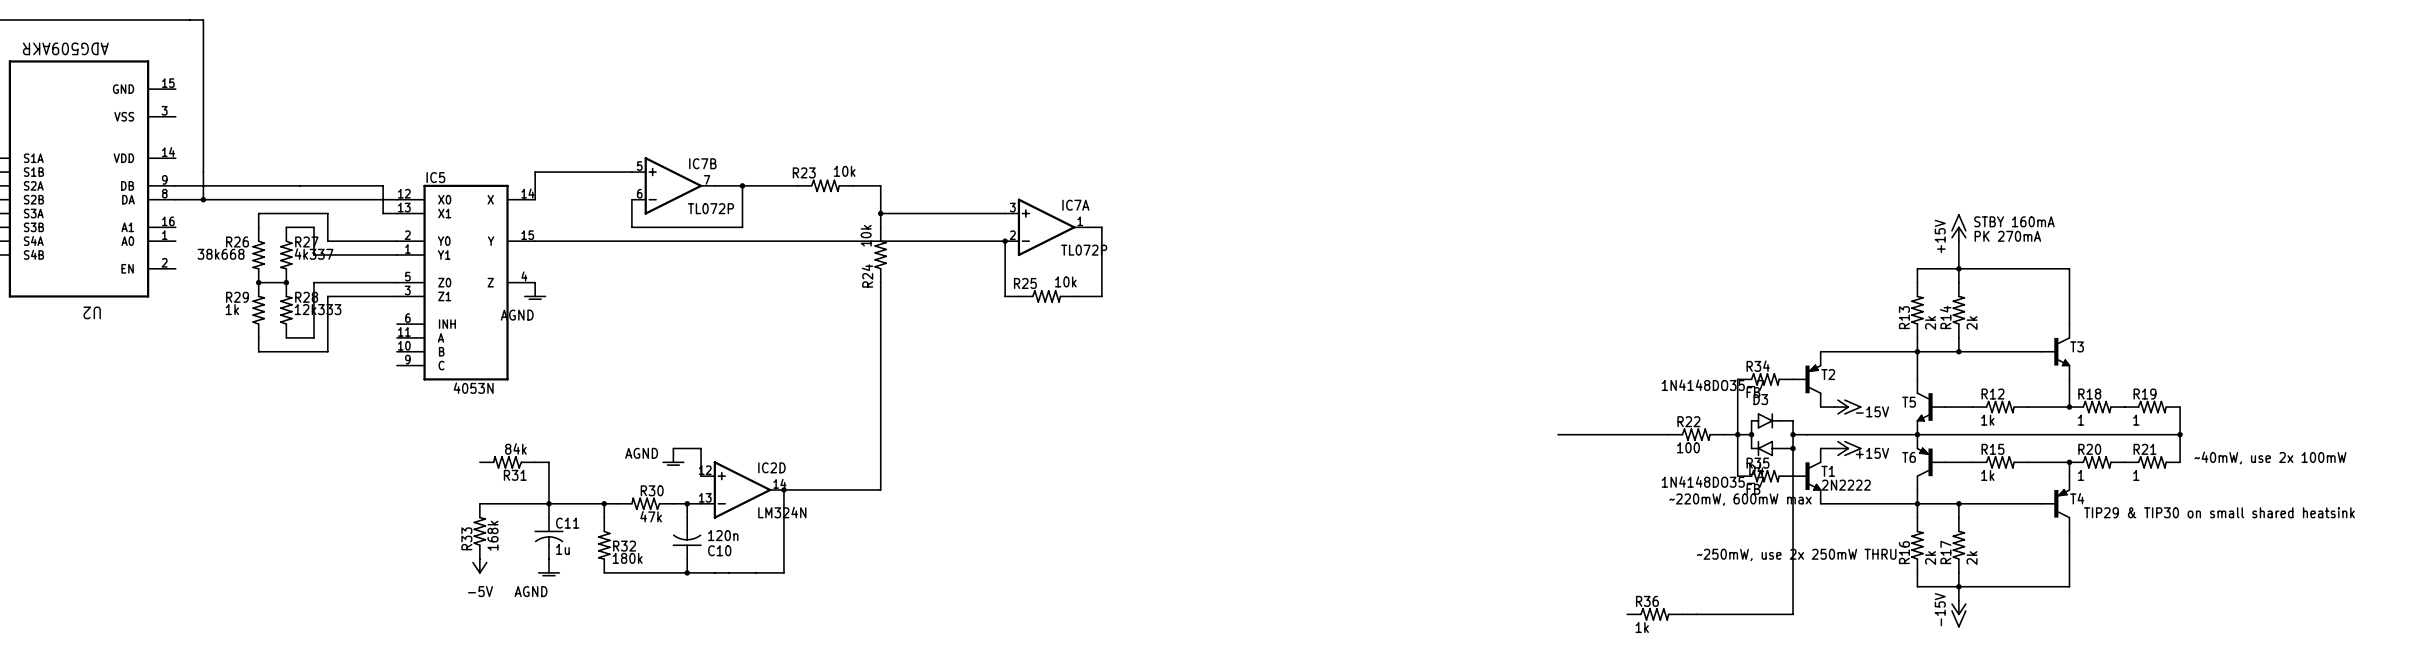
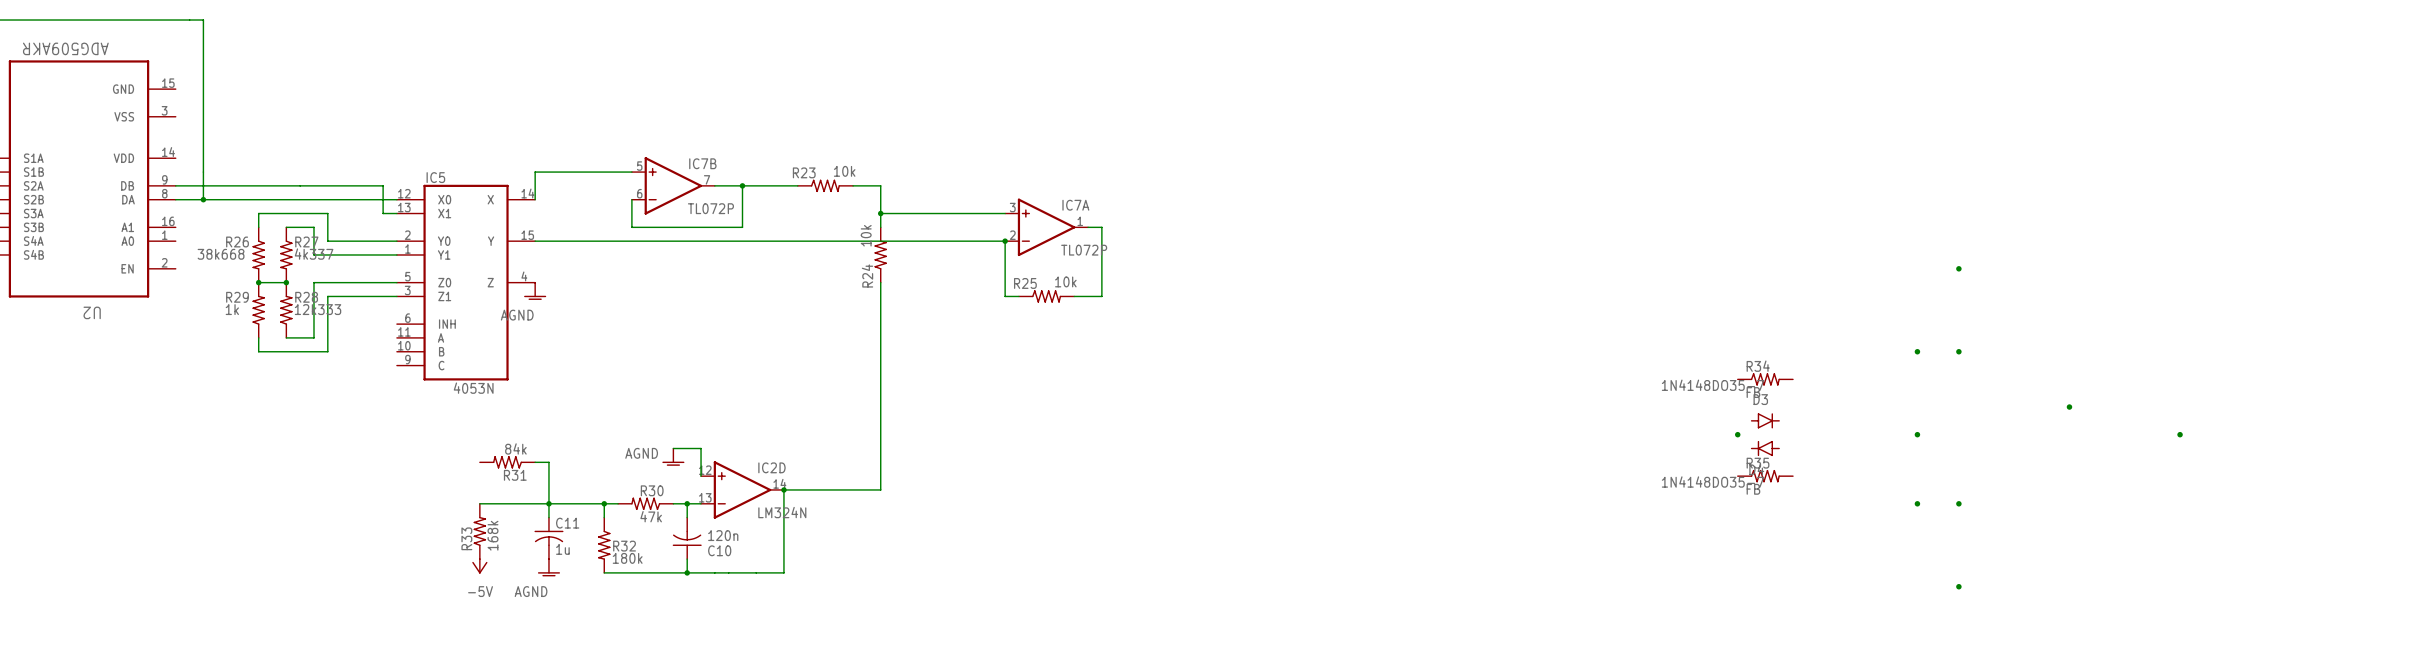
text: STBY 160mA (2014, 221) -> none
power symbol: +15V (1958, 227) -> none
text: PK 270mA (2007, 236) -> none
wire: (1958, 241) (1958, 282) -> none
wire: (1917, 282) (1917, 268) (2069, 268) (2069, 324) -> none
R13: 2k (1917, 310) -> none
R14: 2k (1958, 310) -> none
wire: (1917, 337) (1917, 379) -> none
wire: (1958, 337) (1958, 351) -> none
wire: (1820, 351) (2041, 351) -> none
T3: (2055, 351) -> none
wire: (1737, 379) (1737, 476) -> none
T2: (1807, 379) -> none
wire: (2069, 379) (2069, 407) (2028, 407) -> none
wire: (1820, 407) (1834, 407) -> none
power symbol: -15V (1847, 407) -> none
T5: (1931, 407) -> none
wire: (1945, 407) (1972, 407) -> none
R12: 1k (2000, 407) -> none
R18: 1 (2097, 407) -> none
R19: 1 (2152, 407) -> none
wire: (2180, 407) (2180, 462) -> none
wire: (1751, 420) (1751, 448) -> none
wire: (1779, 420) (1793, 420) (1793, 614) (1682, 614) -> none
wire: (1558, 434) (1668, 434) -> none
R22: 100 (1696, 434) -> none
wire: (1723, 434) (1751, 434) -> none
junction: (1751, 434) -> none
wire: (1793, 434) (2180, 434) -> none
junction: (1793, 434) -> none
wire: (1779, 448) (1793, 448) -> none
junction: (1793, 448) -> none
wire: (1820, 448) (1834, 448) -> none
power symbol: +15V (1847, 448) -> none
text: ~40mW, use 2x 100mW (2270, 457) -> none
T6: (1931, 462) -> none
wire: (1945, 462) (1972, 462) -> none
R15: 1k (2000, 462) -> none
wire: (2028, 462) (2069, 462) (2069, 476) -> none
junction: (2069, 462) -> none
R20: 1 (2097, 462) -> none
R21: 1 (2152, 462) -> none
T1: 2N2222 (1807, 476) -> none
wire: (1917, 489) (1917, 517) -> none
text: ~220mW, 600mW max (1740, 499) -> none
wire: (1820, 503) (2041, 503) -> none
wire: (1958, 503) (1958, 517) -> none
T4: (2055, 503) -> none
text: TIP29 & TIP30 on small shared heatsink (2219, 512) -> none
wire: (2069, 531) (2069, 586) (1917, 586) (1917, 572) -> none
R16: 2k (1917, 545) -> none
R17: 2k (1958, 545) -> none
text: ~250mW, use 2x 250mW THRU (1796, 554) -> none
wire: (1958, 572) (1958, 600) -> none
R36: 1k (1654, 614) -> none
power symbol: -15V (1958, 614) -> none

